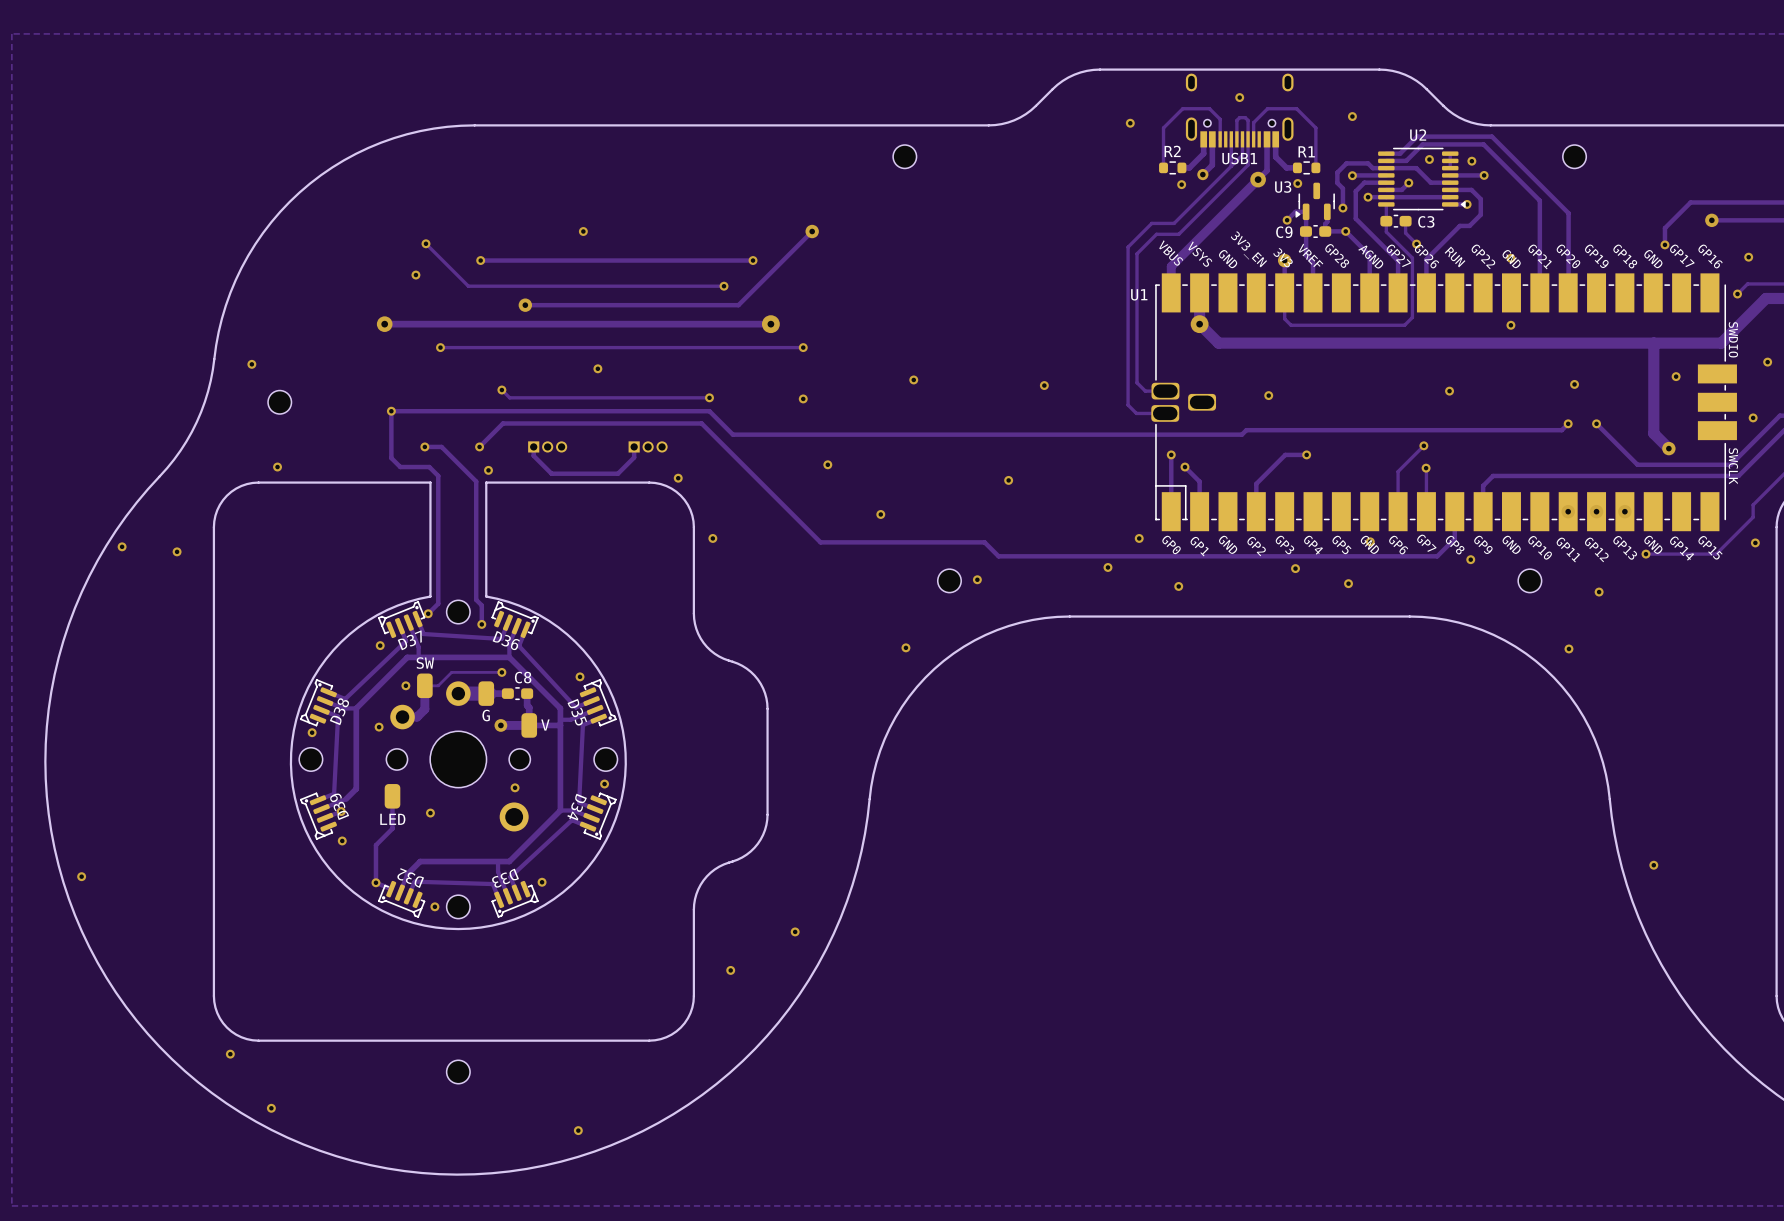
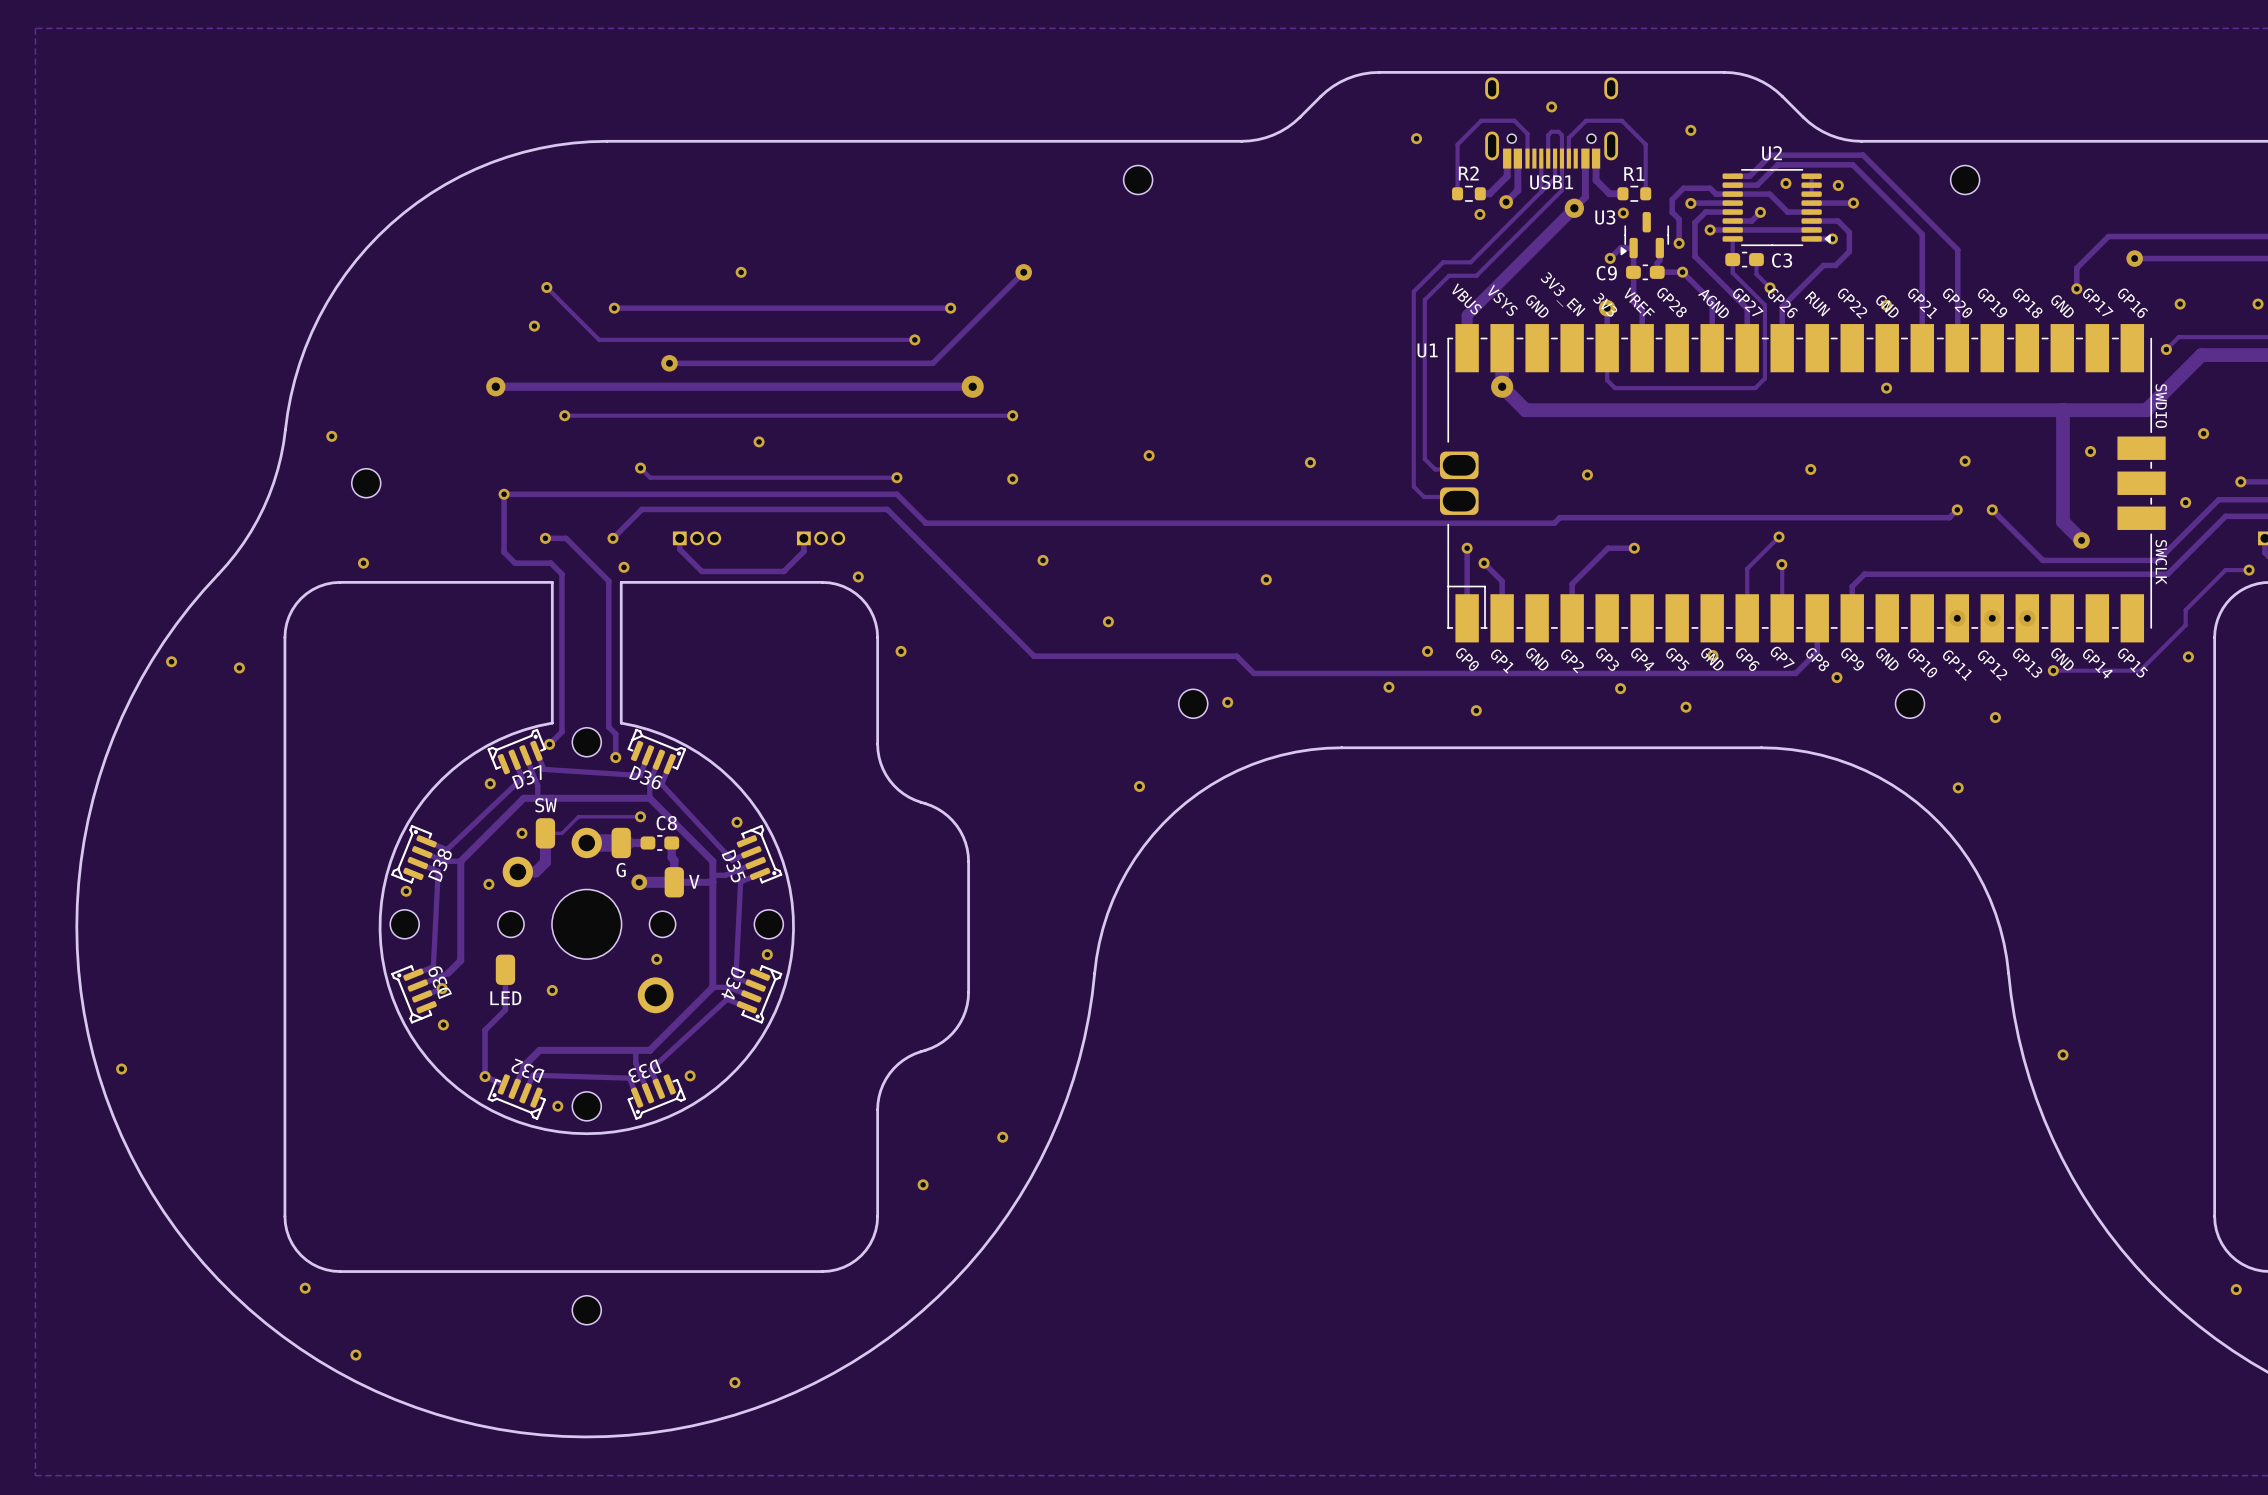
U1 footprint: [1151, 273, 1737, 532] -> [1439, 324, 2166, 643]

